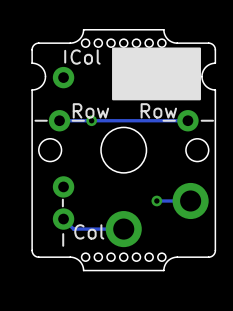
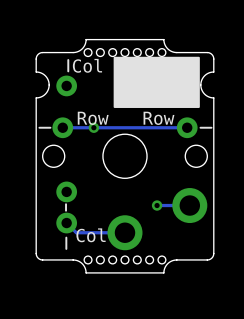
line: (83, 120) (72, 120) -> none
line: (174, 120) (163, 120) -> none

